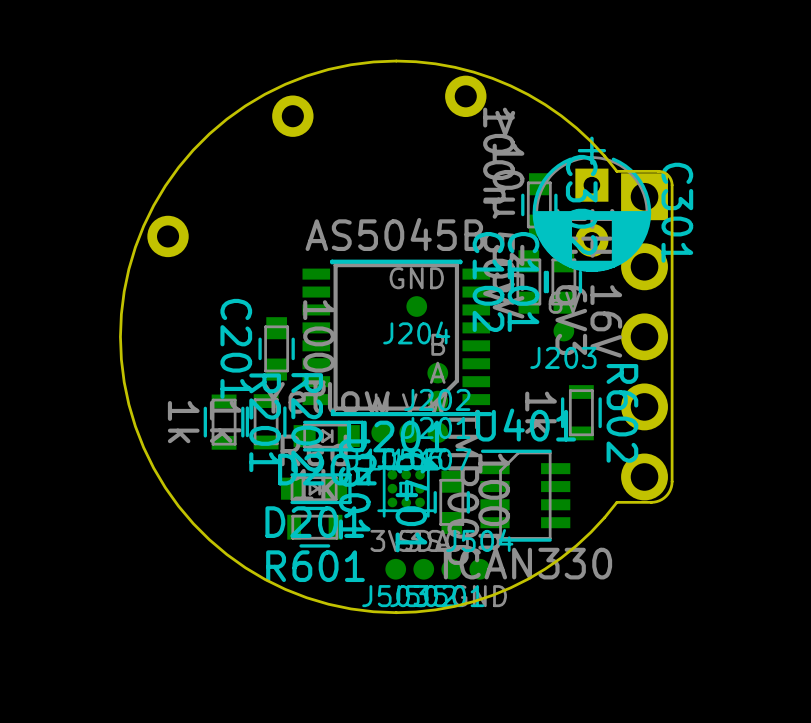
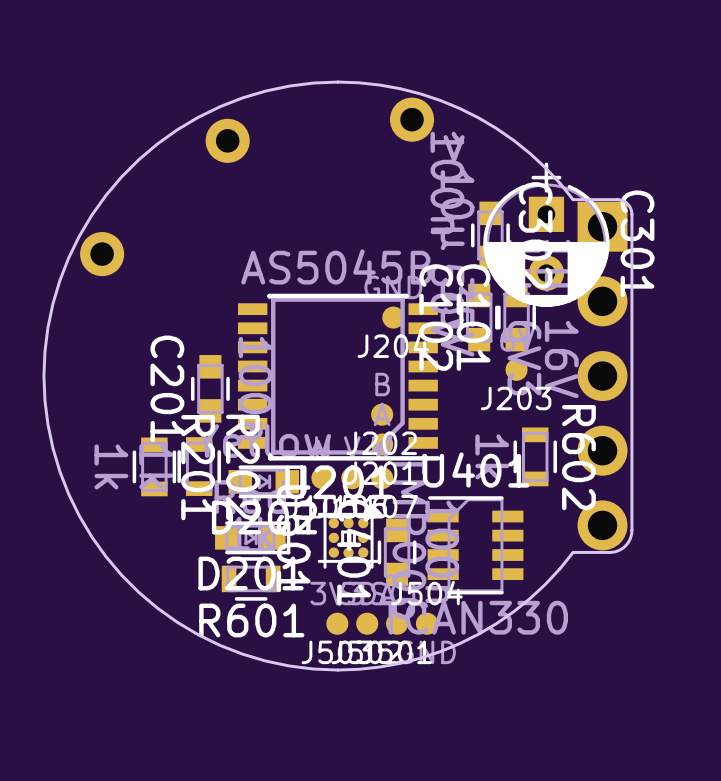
part position: (168, 236) -> (102, 254)
J204 position: (416, 306) -> (393, 317)

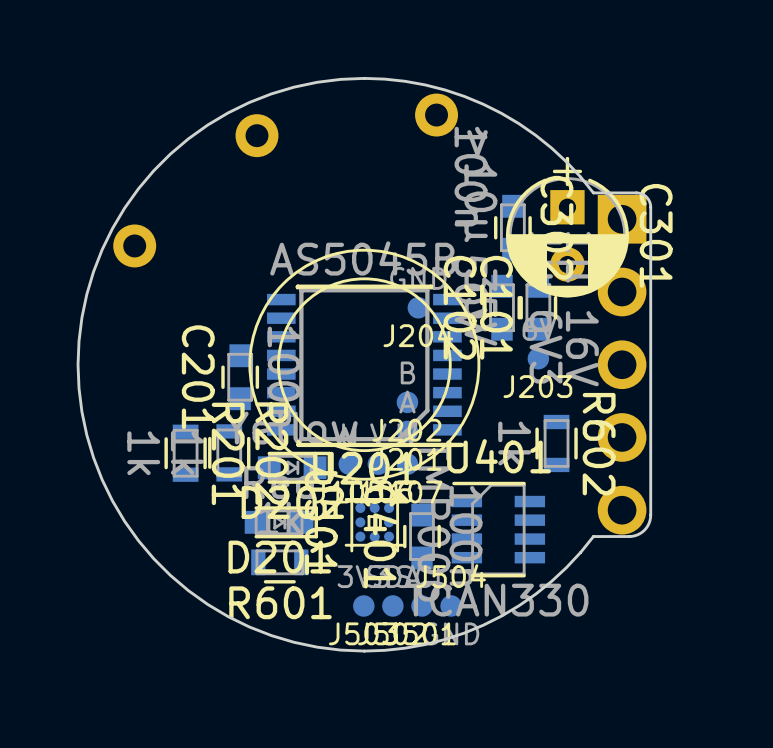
drawing: none -> [248, 248, 481, 481]

